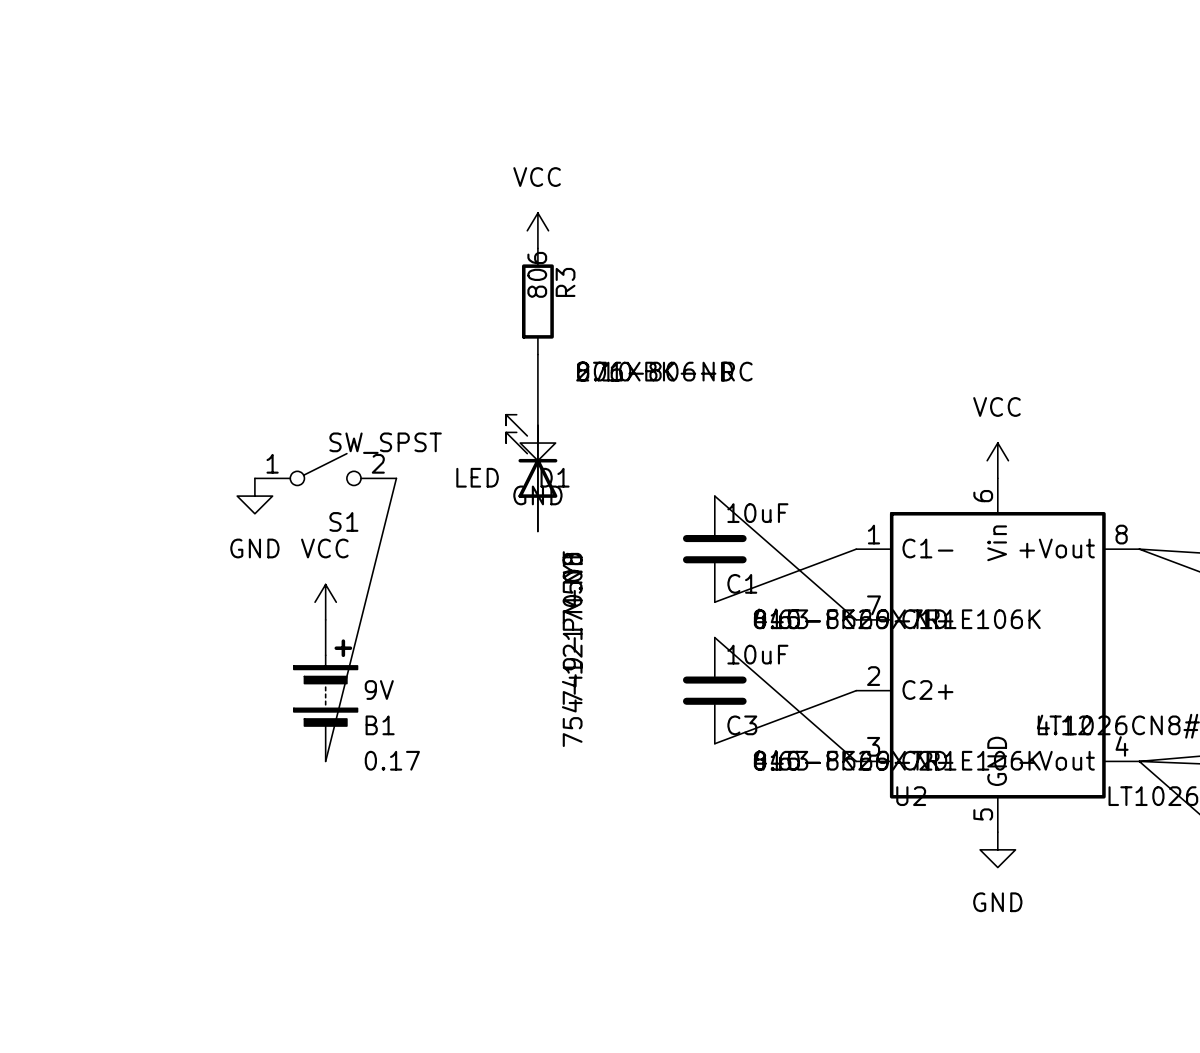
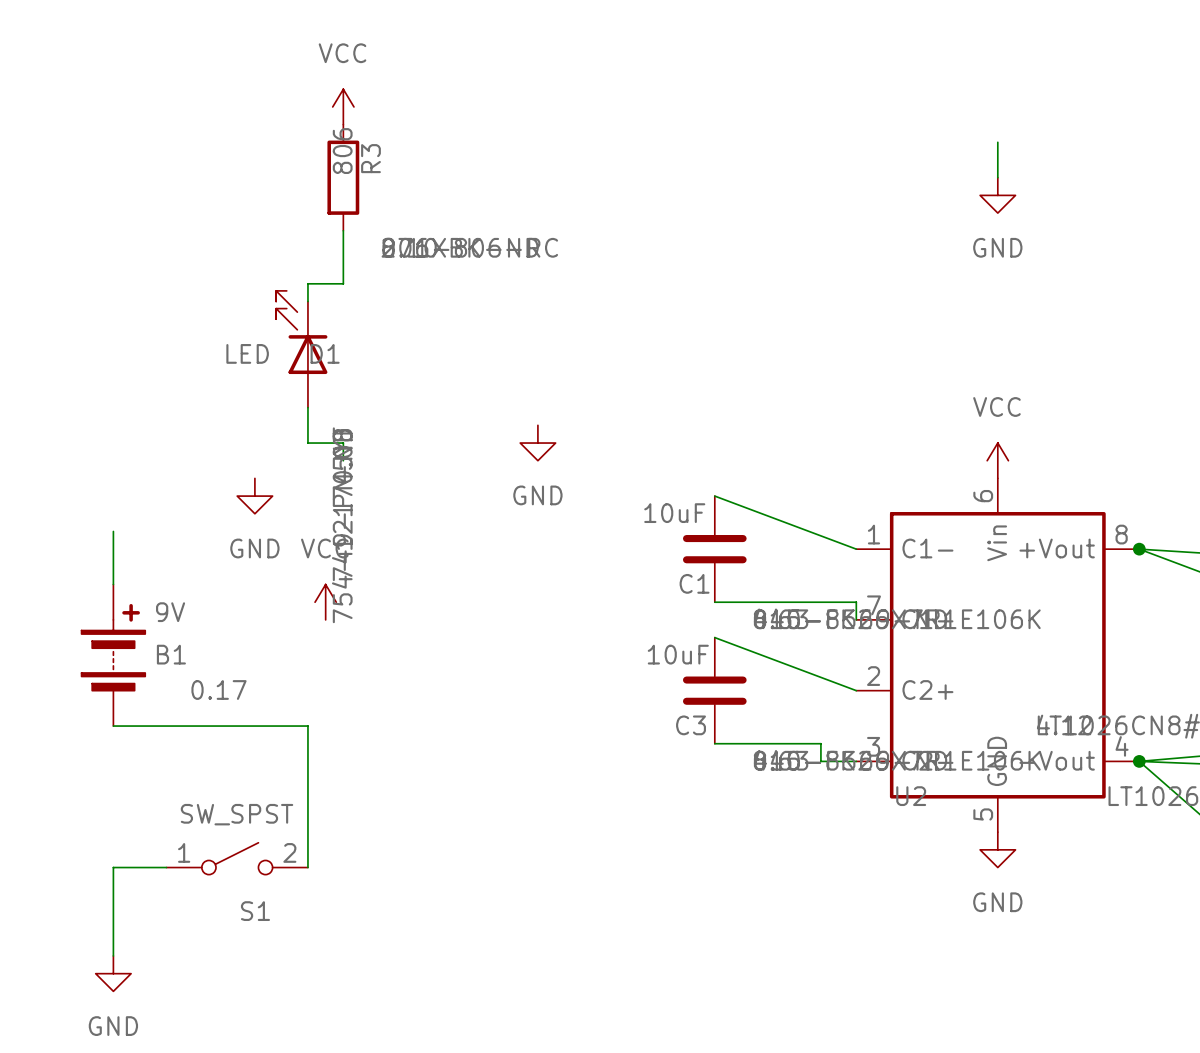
wire: none -> (997, 142) (997, 177)
power symbol: none -> GND (997, 195)
wire: none -> (343, 230) (343, 283) (307, 283) (307, 301)
power symbol position: VCC (537, 230) -> VCC (343, 106)
R3 position: (537, 301) -> (343, 177)
wire: (537, 354) (537, 531) -> none
wire: none -> (307, 407) (307, 443) (343, 443) (343, 460)
S1 value position: SW_SPST (385, 443) -> SW_SPST (237, 814)
S1 position: (325, 469) -> (237, 858)
D1 position: (531, 473) -> (301, 349)
wire: (396, 478) (325, 761) -> none
wire: (714, 496) (856, 619) -> (714, 496) (856, 549)
C1 value position: 10uF (757, 513) -> 10uF (674, 513)
wire: none -> (113, 531) (113, 584)
wire: (856, 549) (714, 602) -> (856, 619) (856, 602) (714, 602)
junction: none -> (1139, 549)
C1 name position: C1 (742, 583) -> C1 (694, 583)
wire: (714, 637) (856, 761) -> (714, 637) (856, 690)
C3 value position: 10uF (757, 654) -> 10uF (678, 654)
B1 position: (325, 690) -> (113, 655)
B1 value position: 9V (379, 690) -> 9V (170, 612)
wire: (856, 690) (714, 743) -> (856, 761) (820, 761) (820, 743) (714, 743)
B1 name position: B1 (380, 725) -> B1 (171, 654)
C3 name position: C3 (742, 725) -> C3 (691, 725)
wire: none -> (113, 726) (307, 726) (307, 867)
B1 text position: 0.17 (392, 760) -> 0.17 (218, 690)
junction: none -> (1139, 761)
wire: none -> (166, 867) (113, 867) (113, 955)
power symbol: none -> GND (113, 973)

